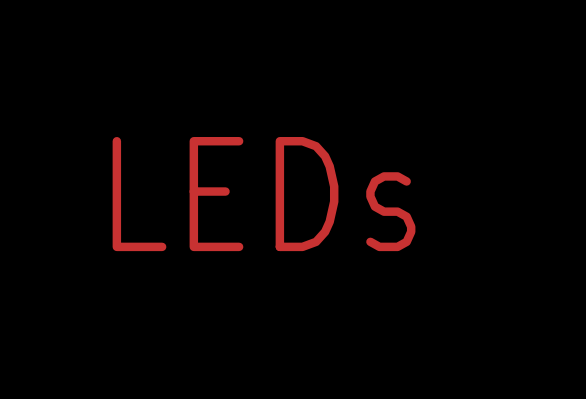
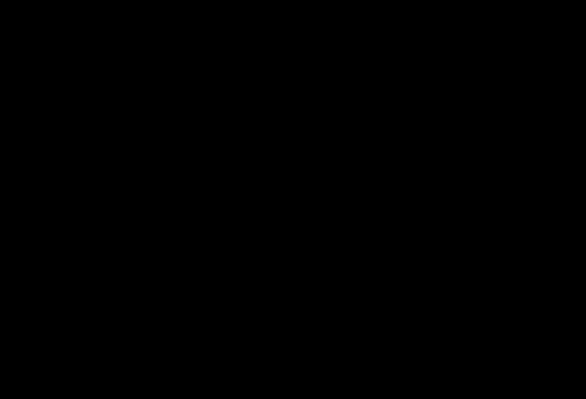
text: LEDs (264, 194) -> none

